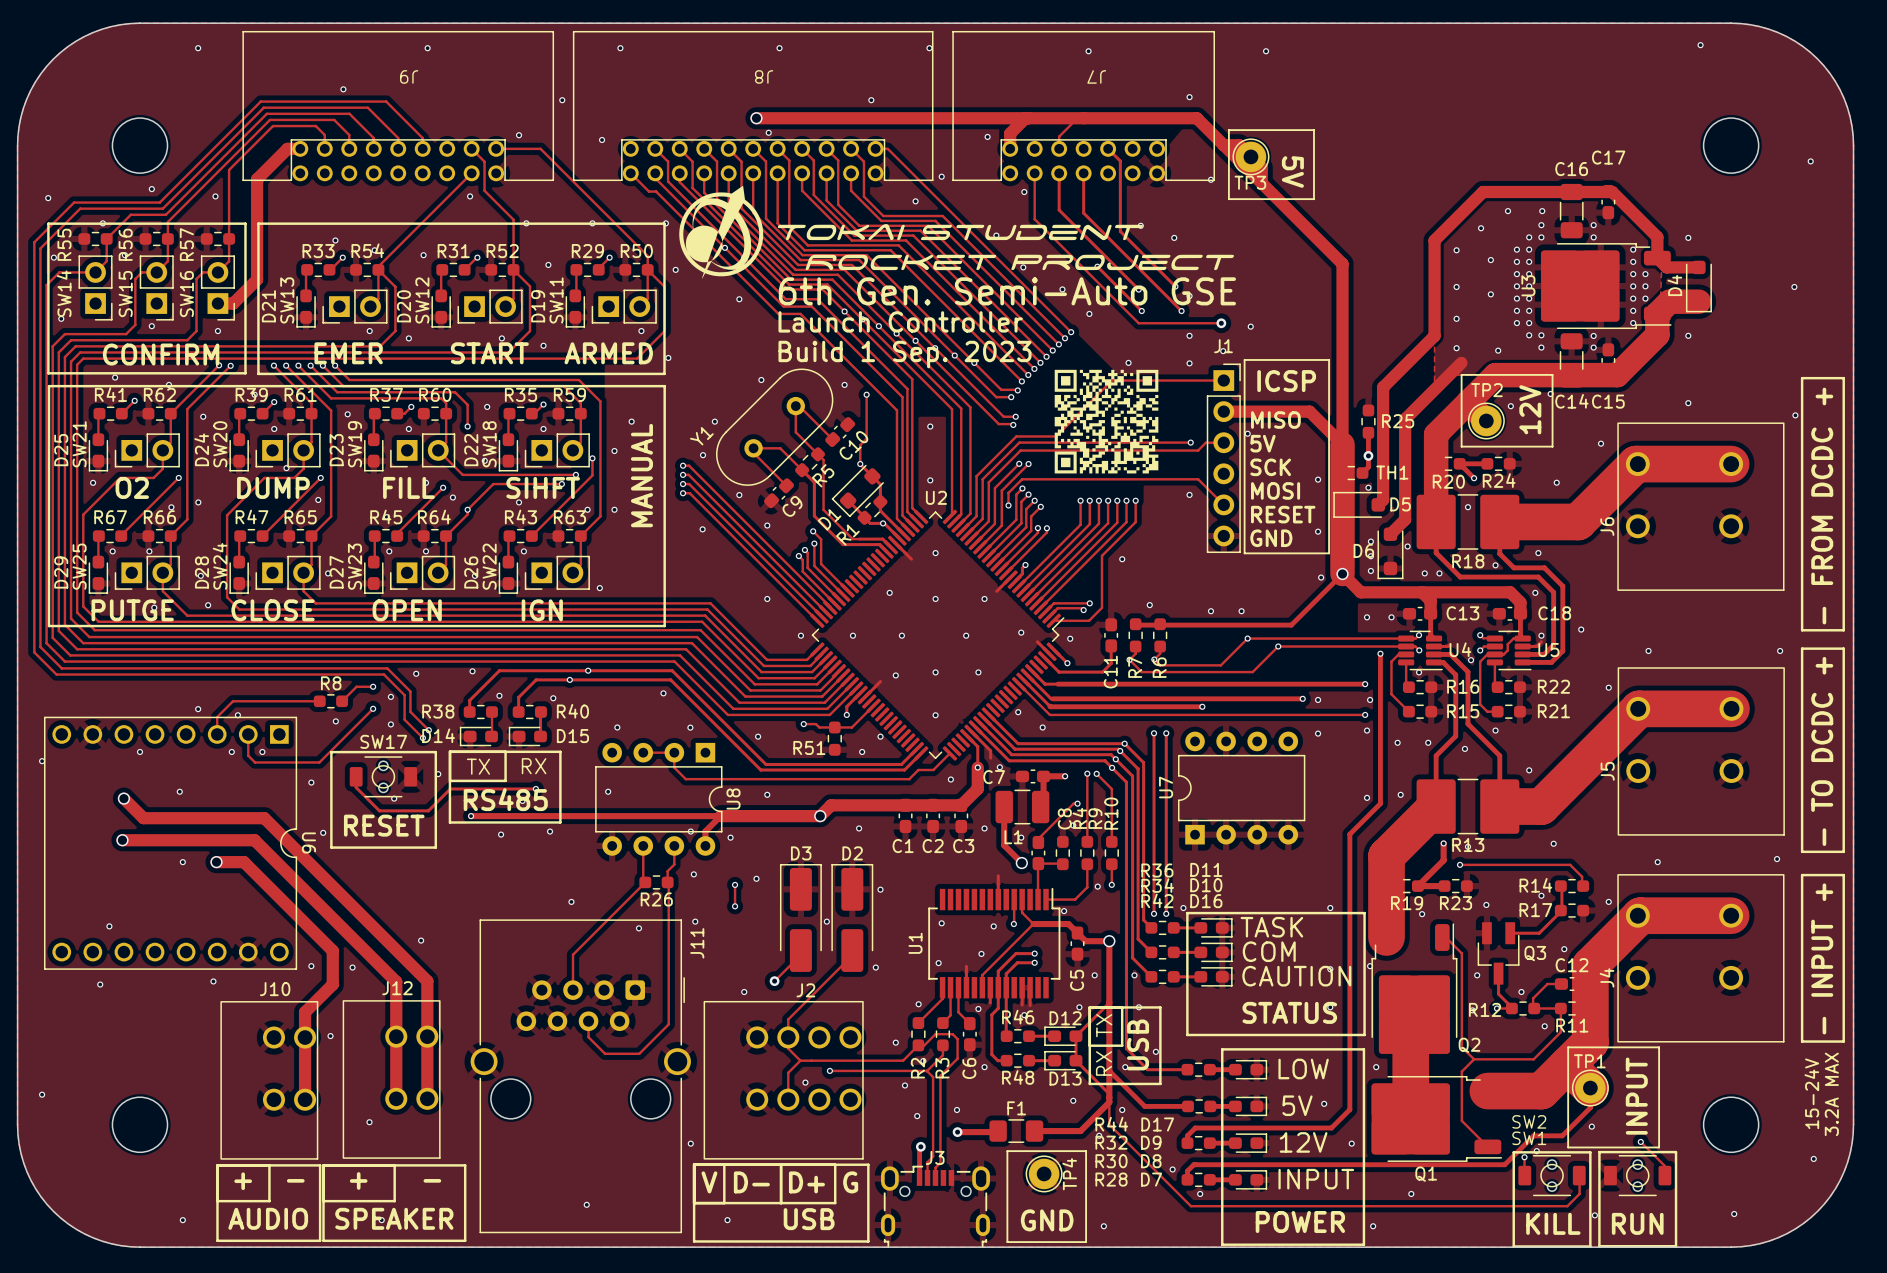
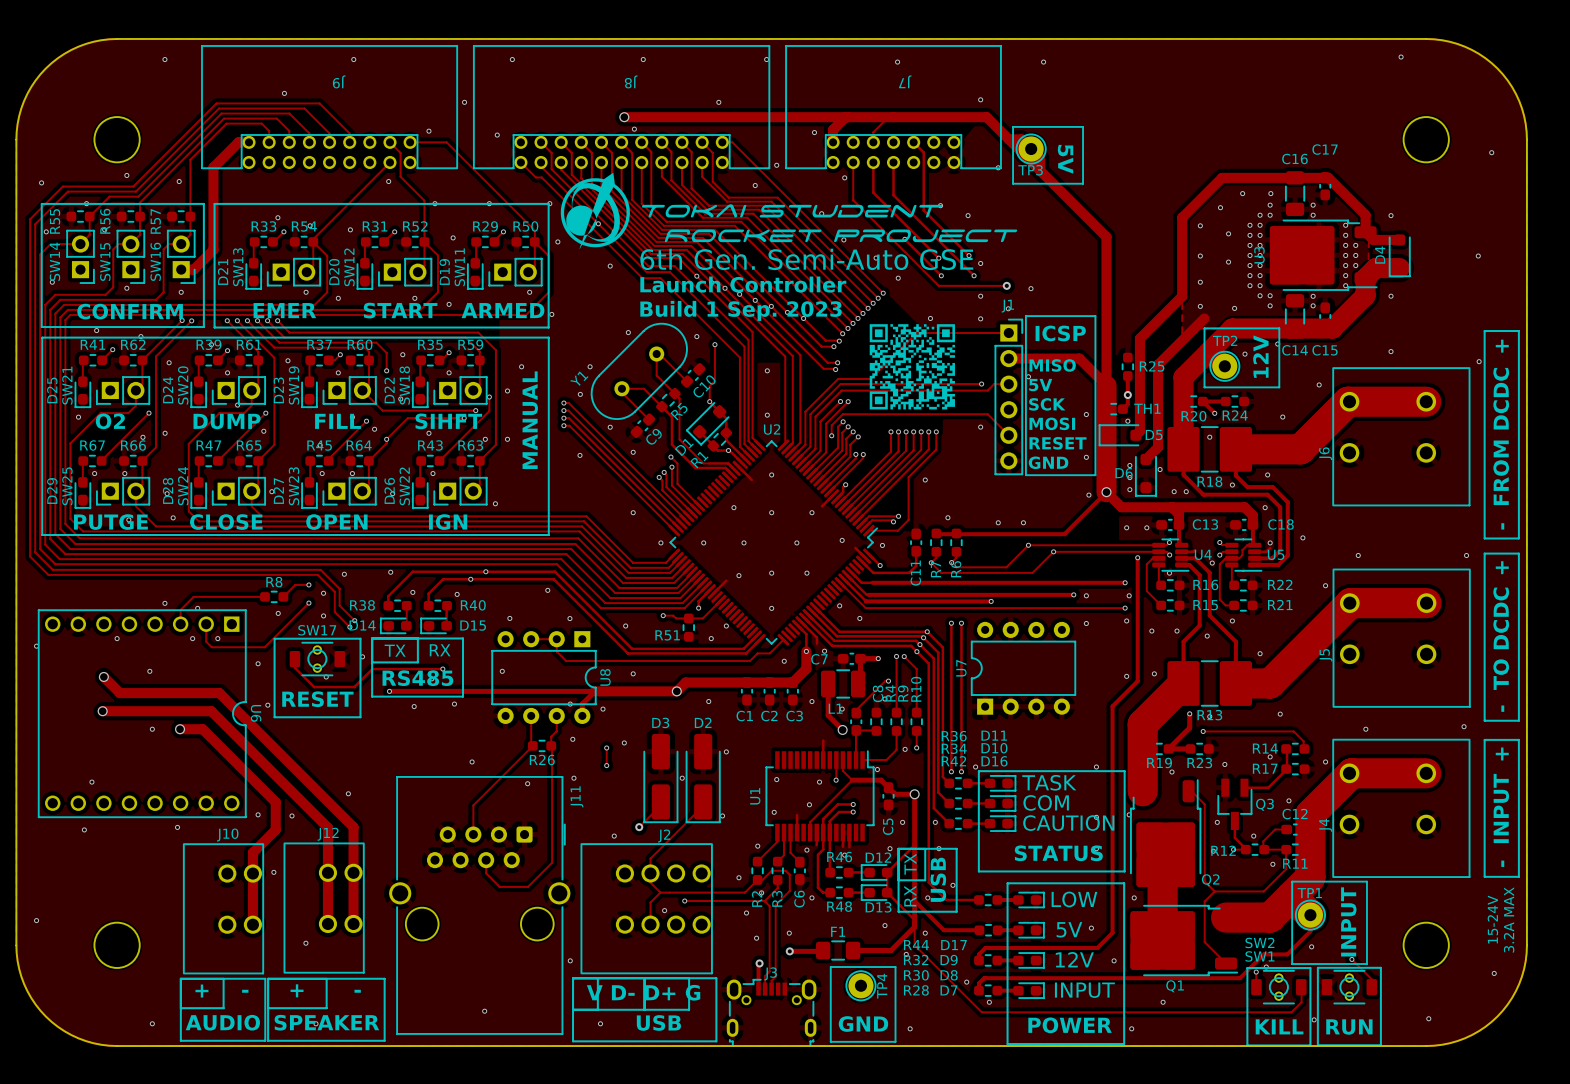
D3 rotation: 0° (800, 917) -> 180° (660, 778)
D2 rotation: 0° (852, 917) -> 180° (703, 778)

